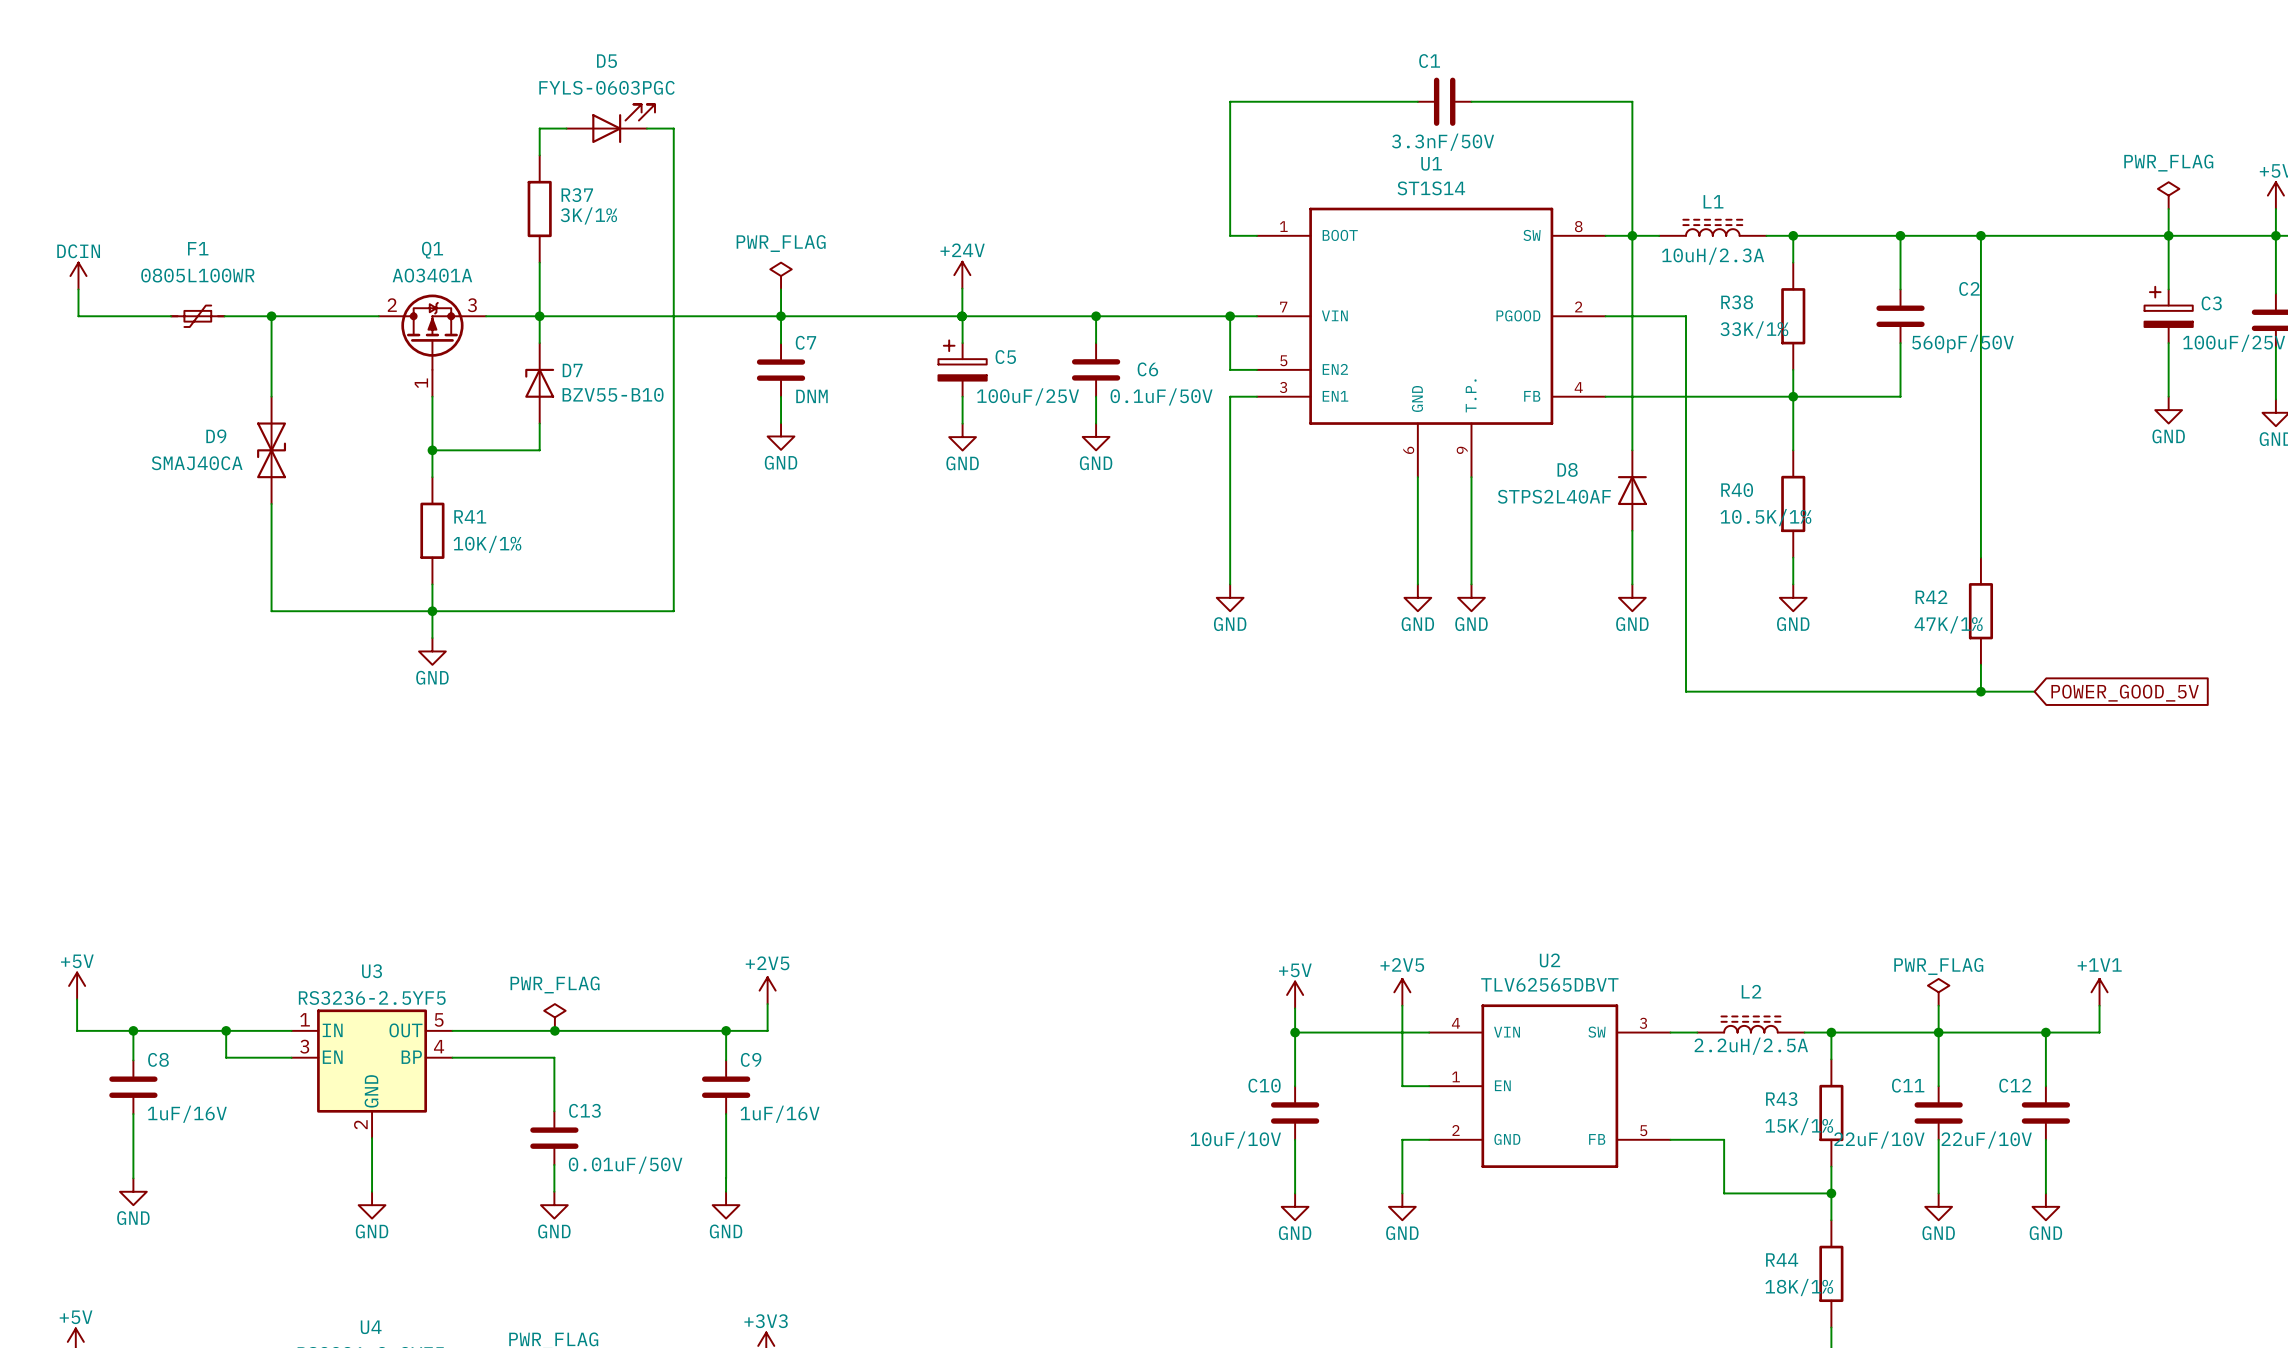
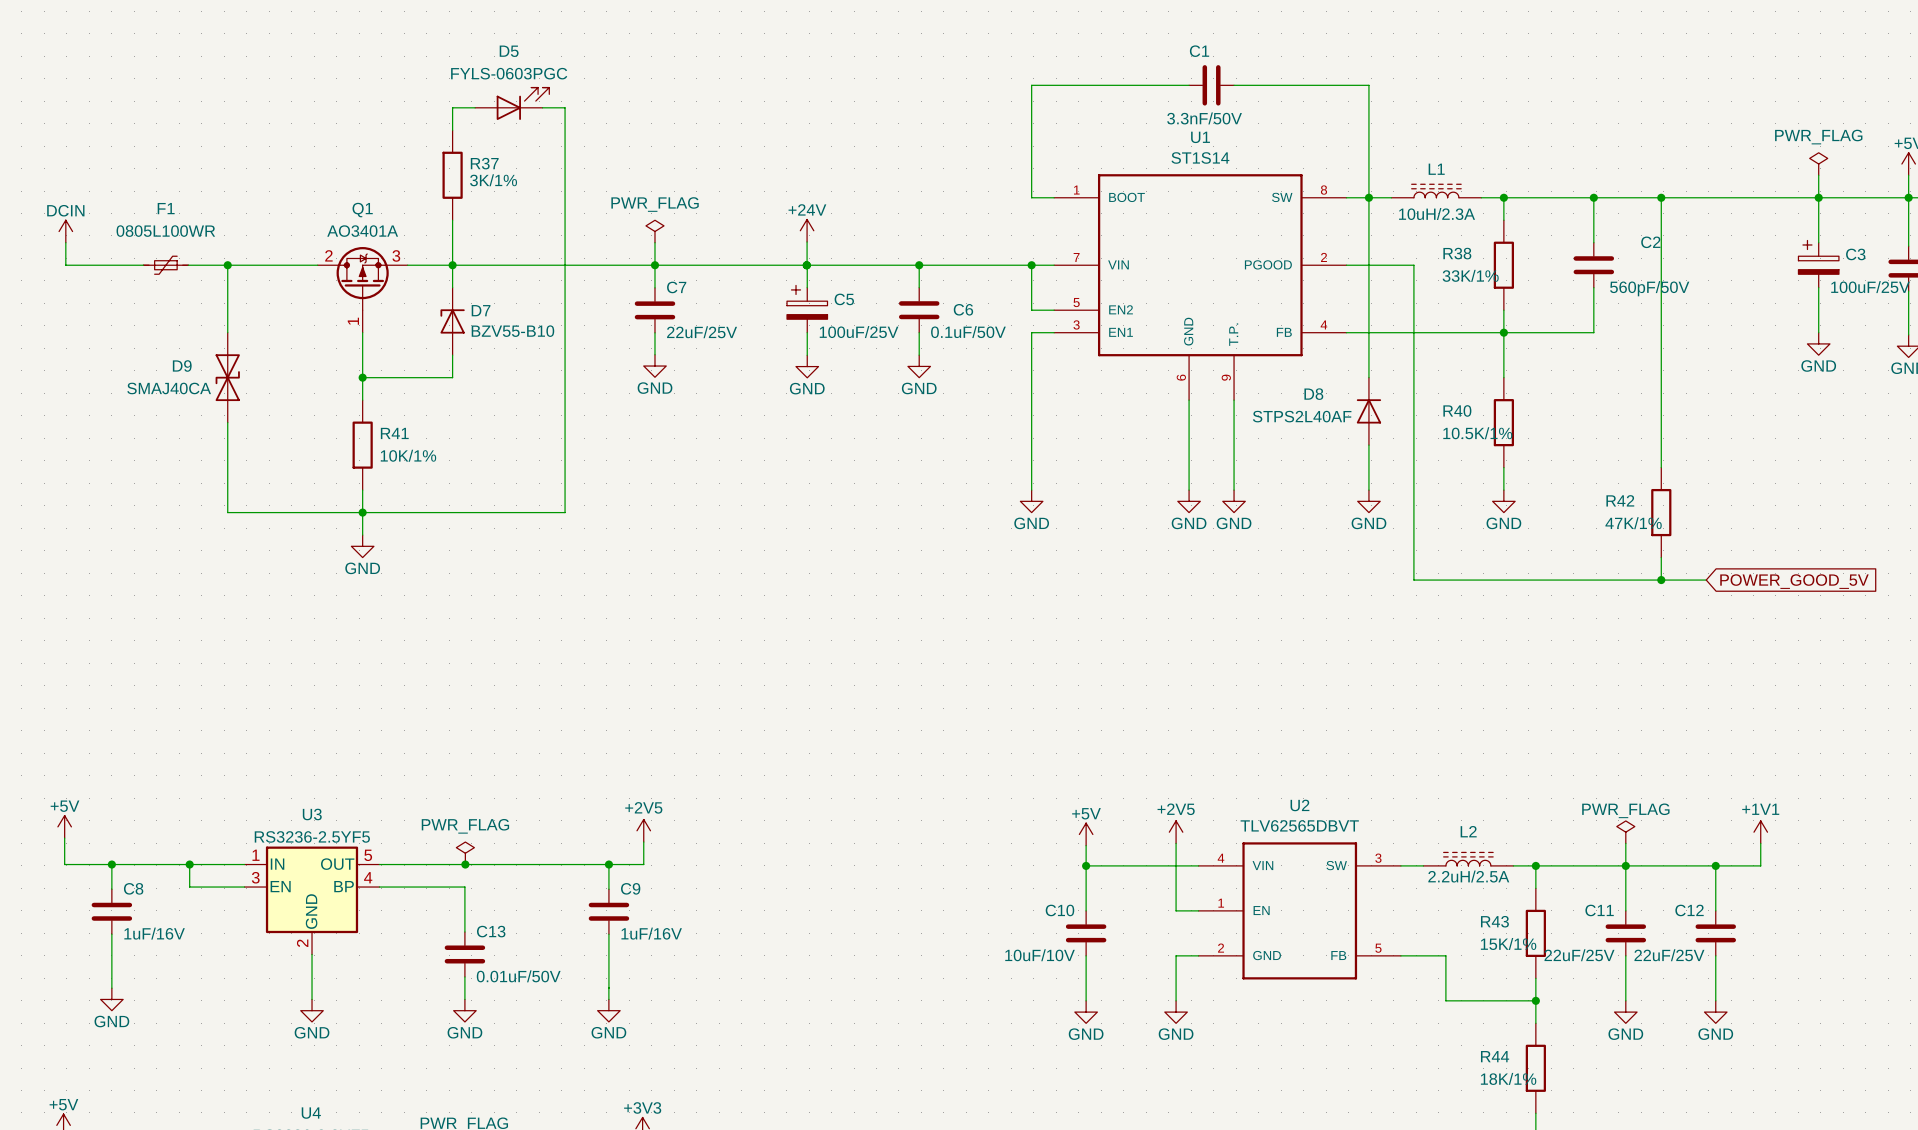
C7 value: DNM (811, 396) -> 22uF/25V (702, 332)
C11 value: 22uF/10V (1879, 1140) -> 22uF/25V (1579, 955)
C12 value: 22uF/10V (1986, 1140) -> 22uF/25V (1669, 955)

